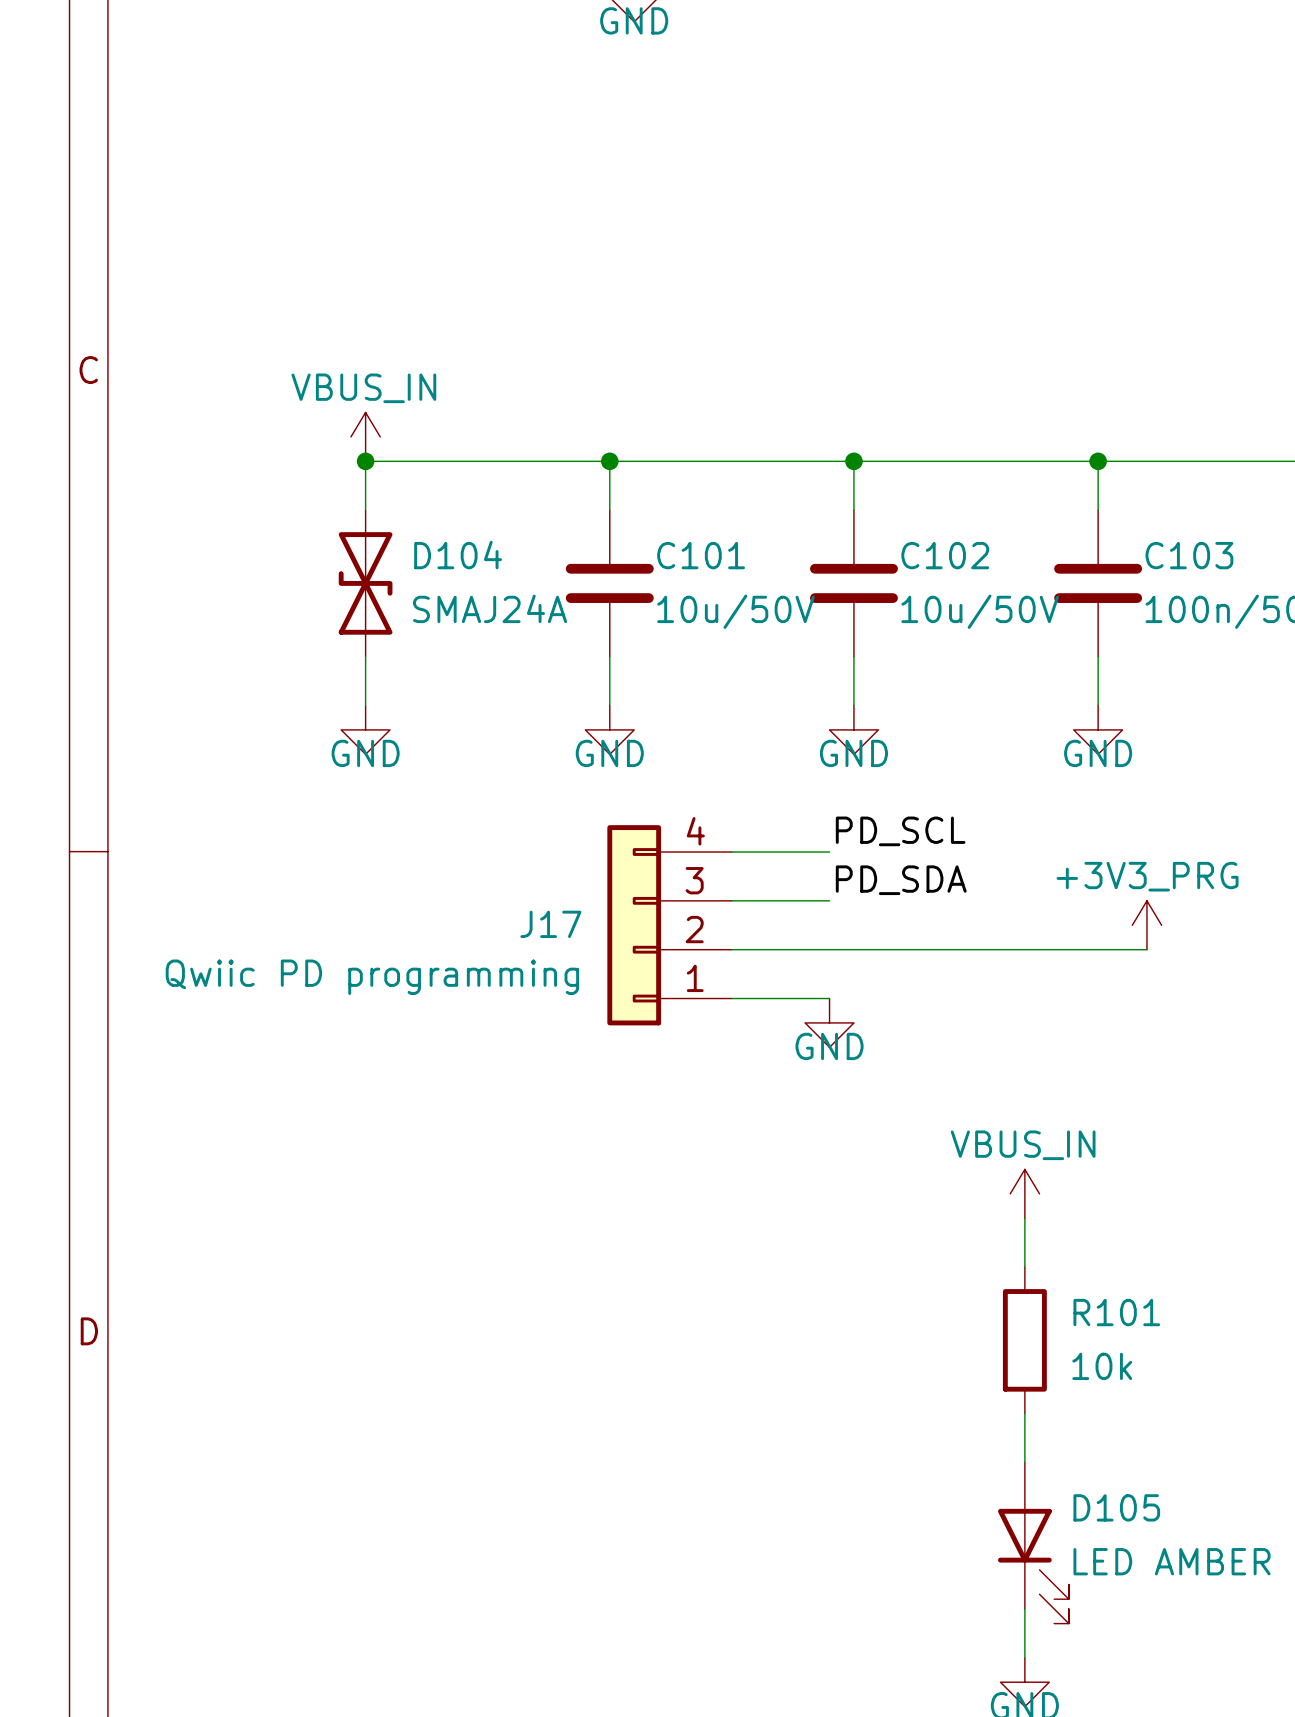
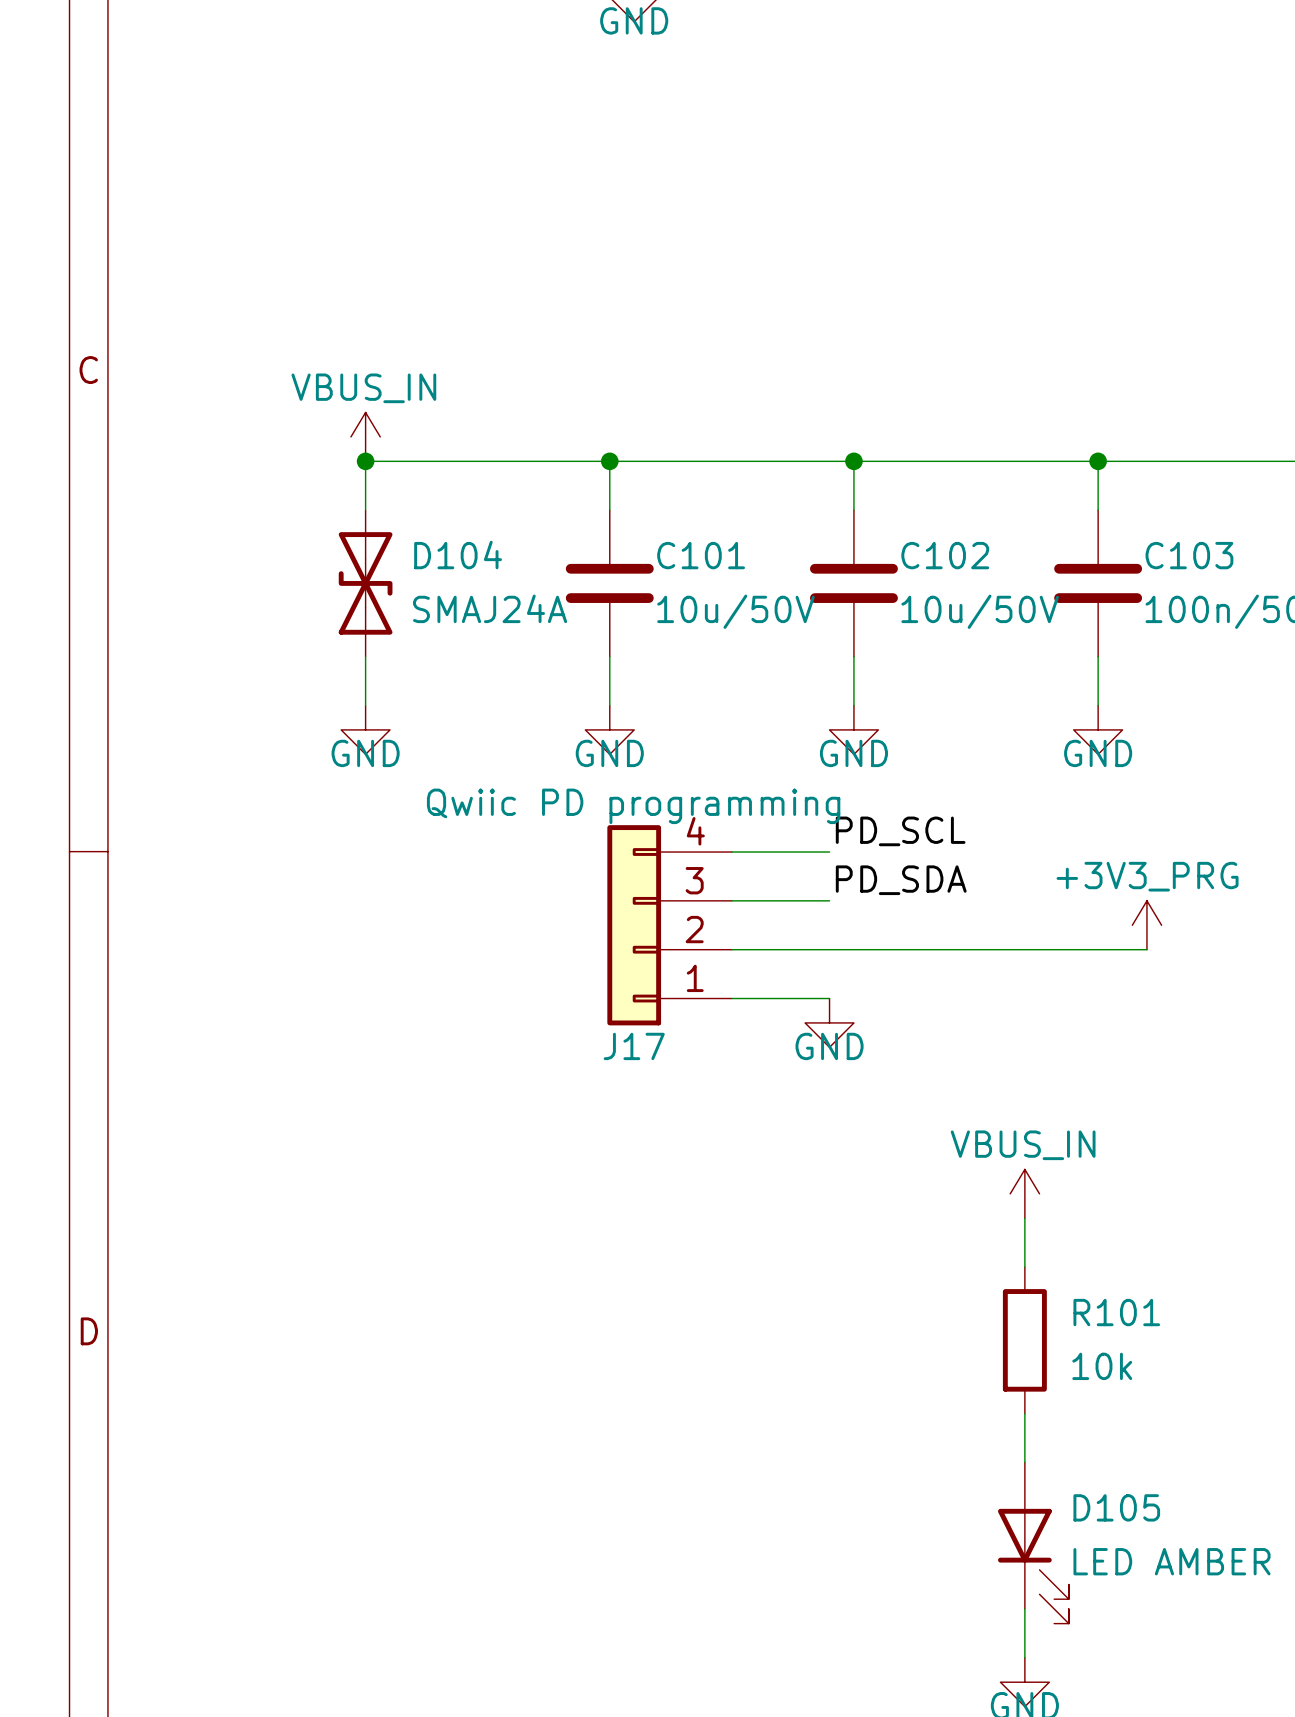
J17 name position: J17 (550, 924) -> J17 (634, 1046)
J17 value position: Qwiic PD programming (372, 977) -> Qwiic PD programming (633, 806)

